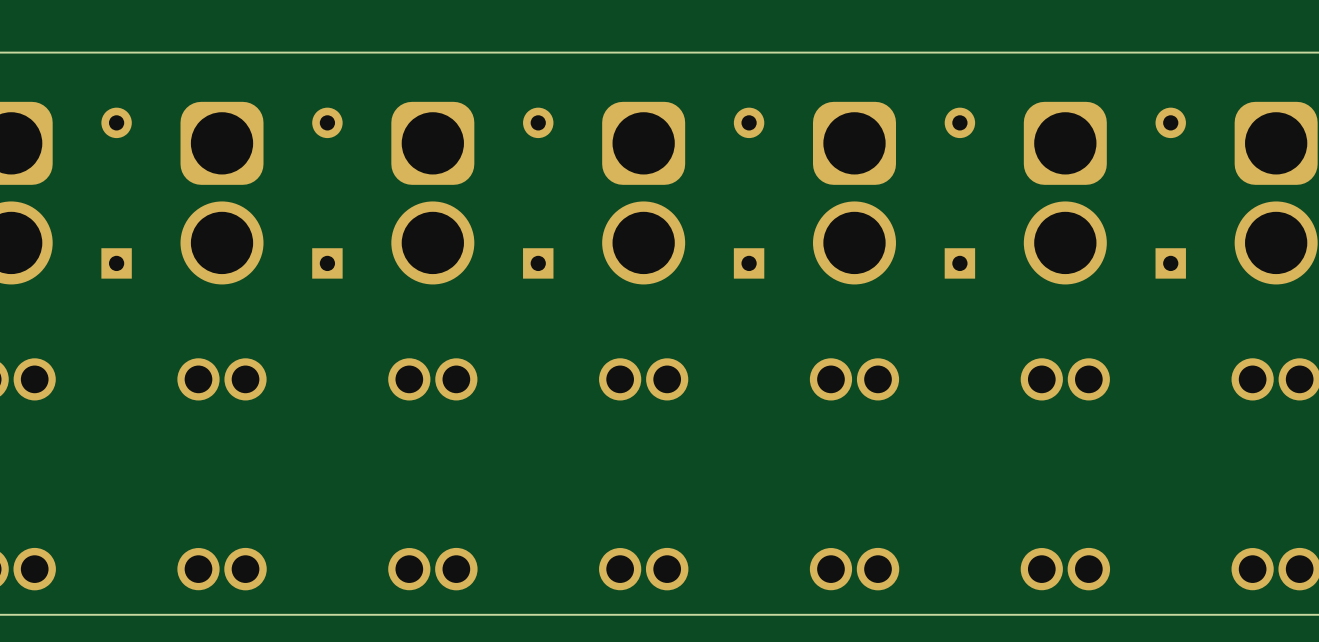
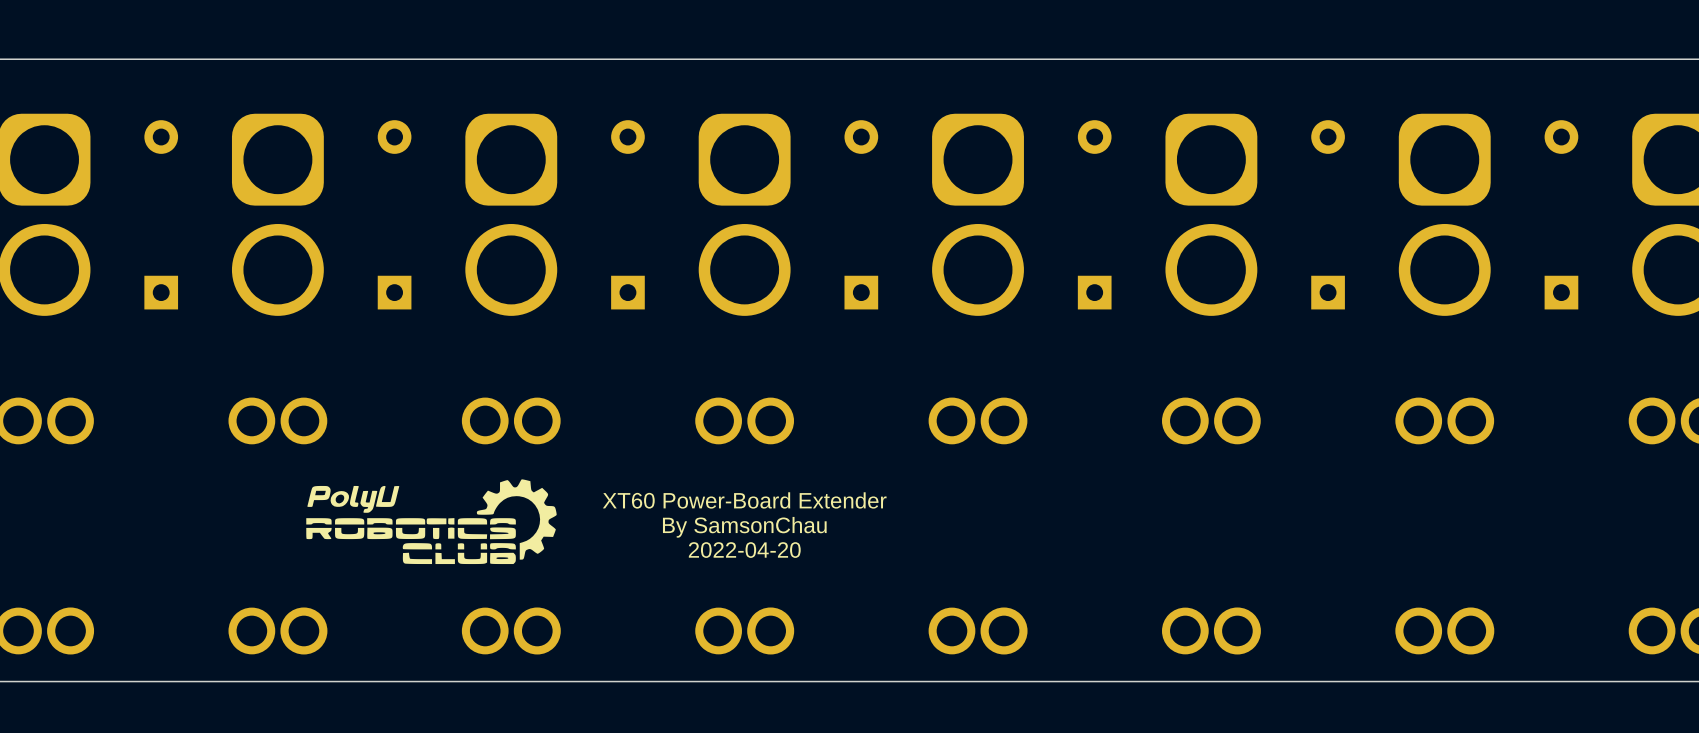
drawing: none -> [306, 479, 557, 565]
text: none -> XT60 Power-Board Extender (744, 500)
text: none -> By SamsonChau (744, 527)
text: none -> 2022-04-20 (744, 550)

